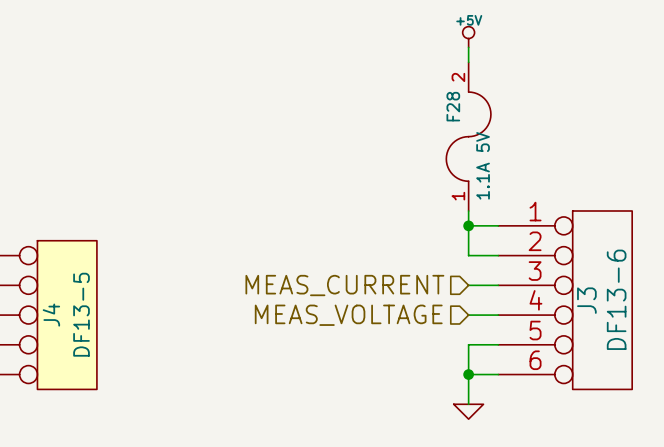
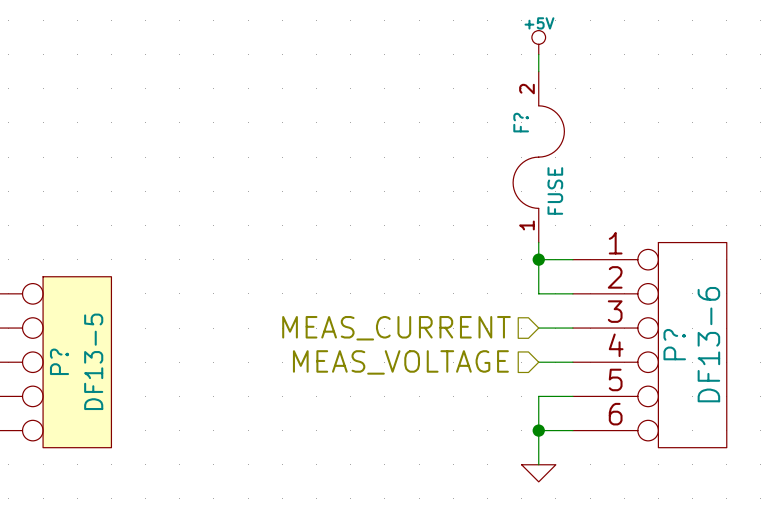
F28 name: F28 (453, 106) -> F? (521, 122)
F28 value: 1.1A 5V (483, 165) -> FUSE (555, 190)
J3 name: J3 (586, 300) -> P? (674, 344)
J4 name: J4 (51, 315) -> P? (59, 361)

